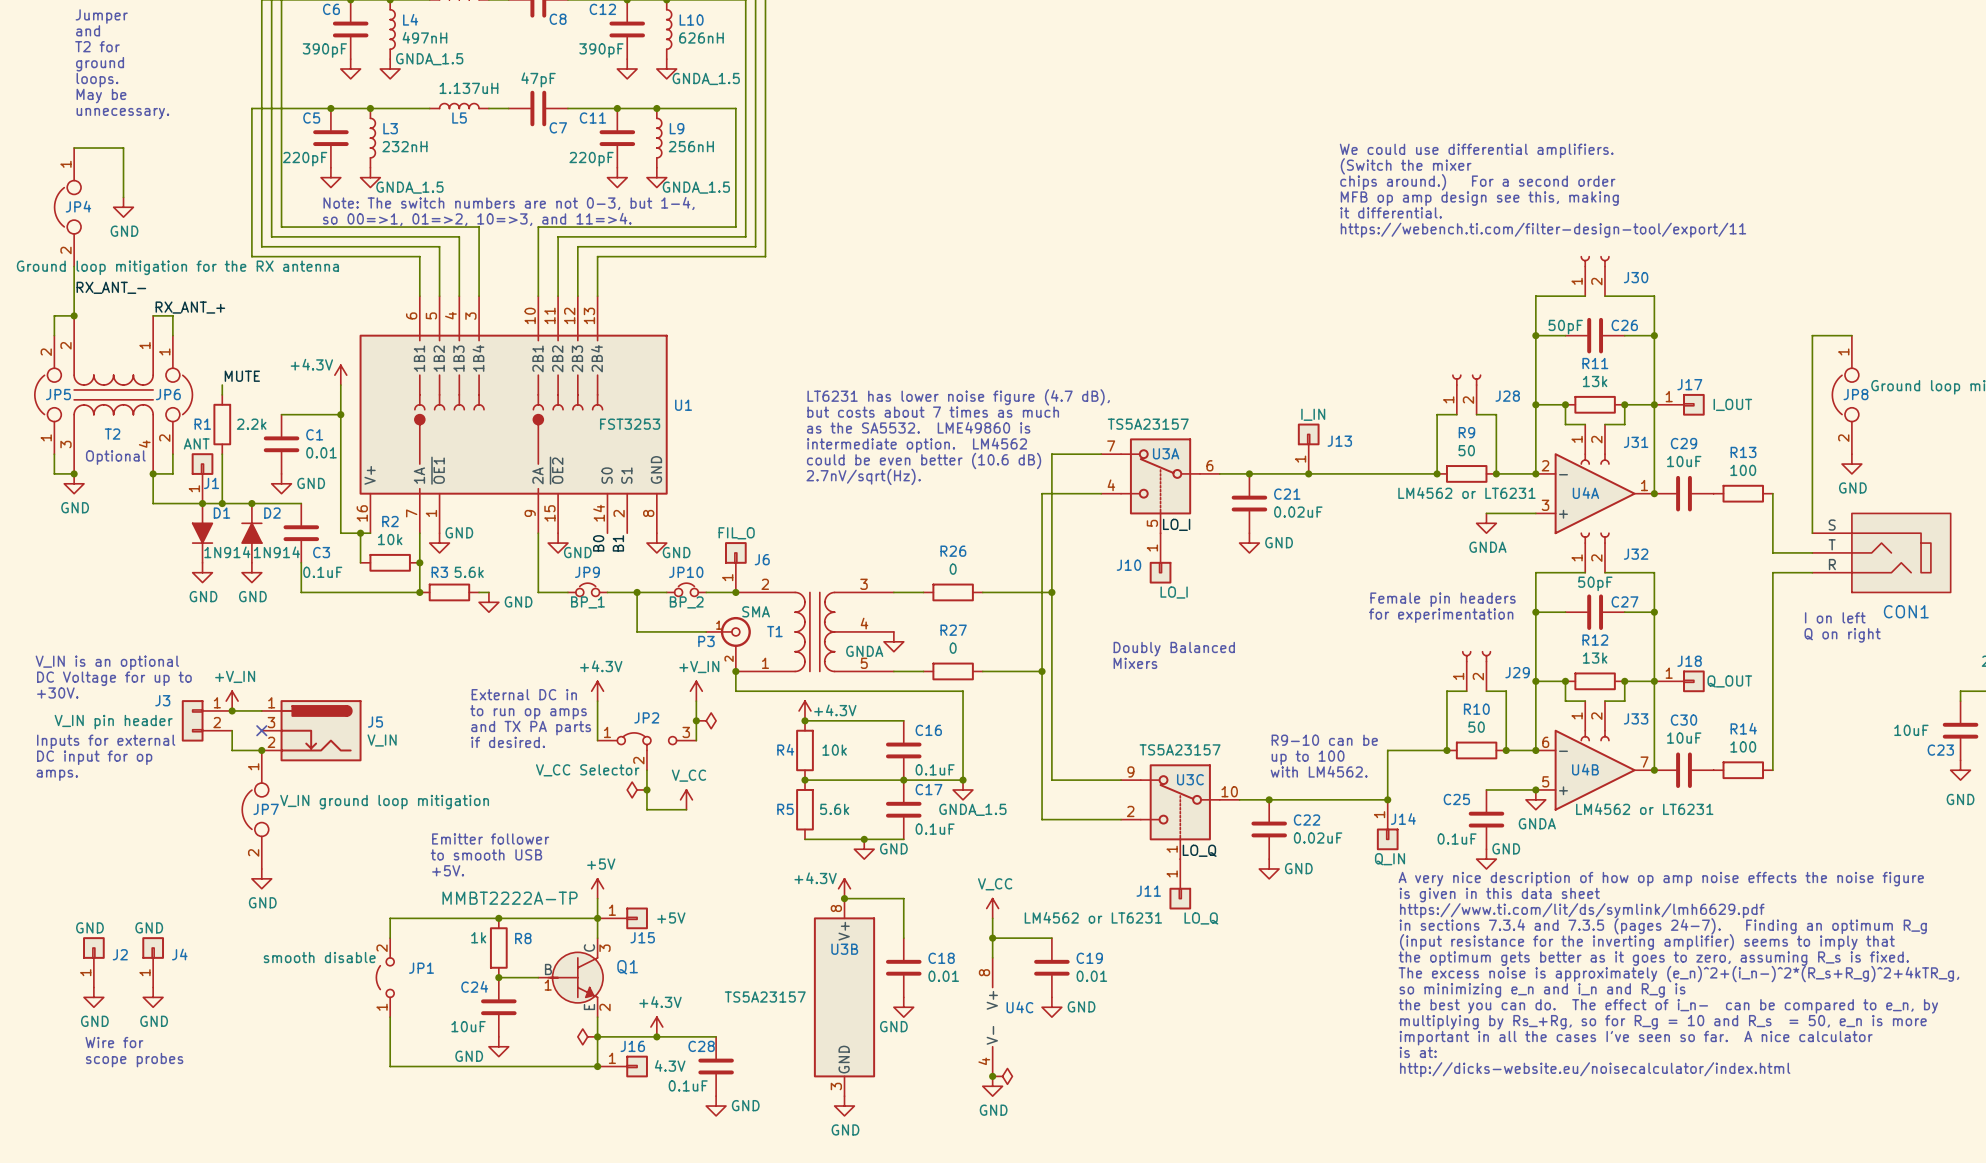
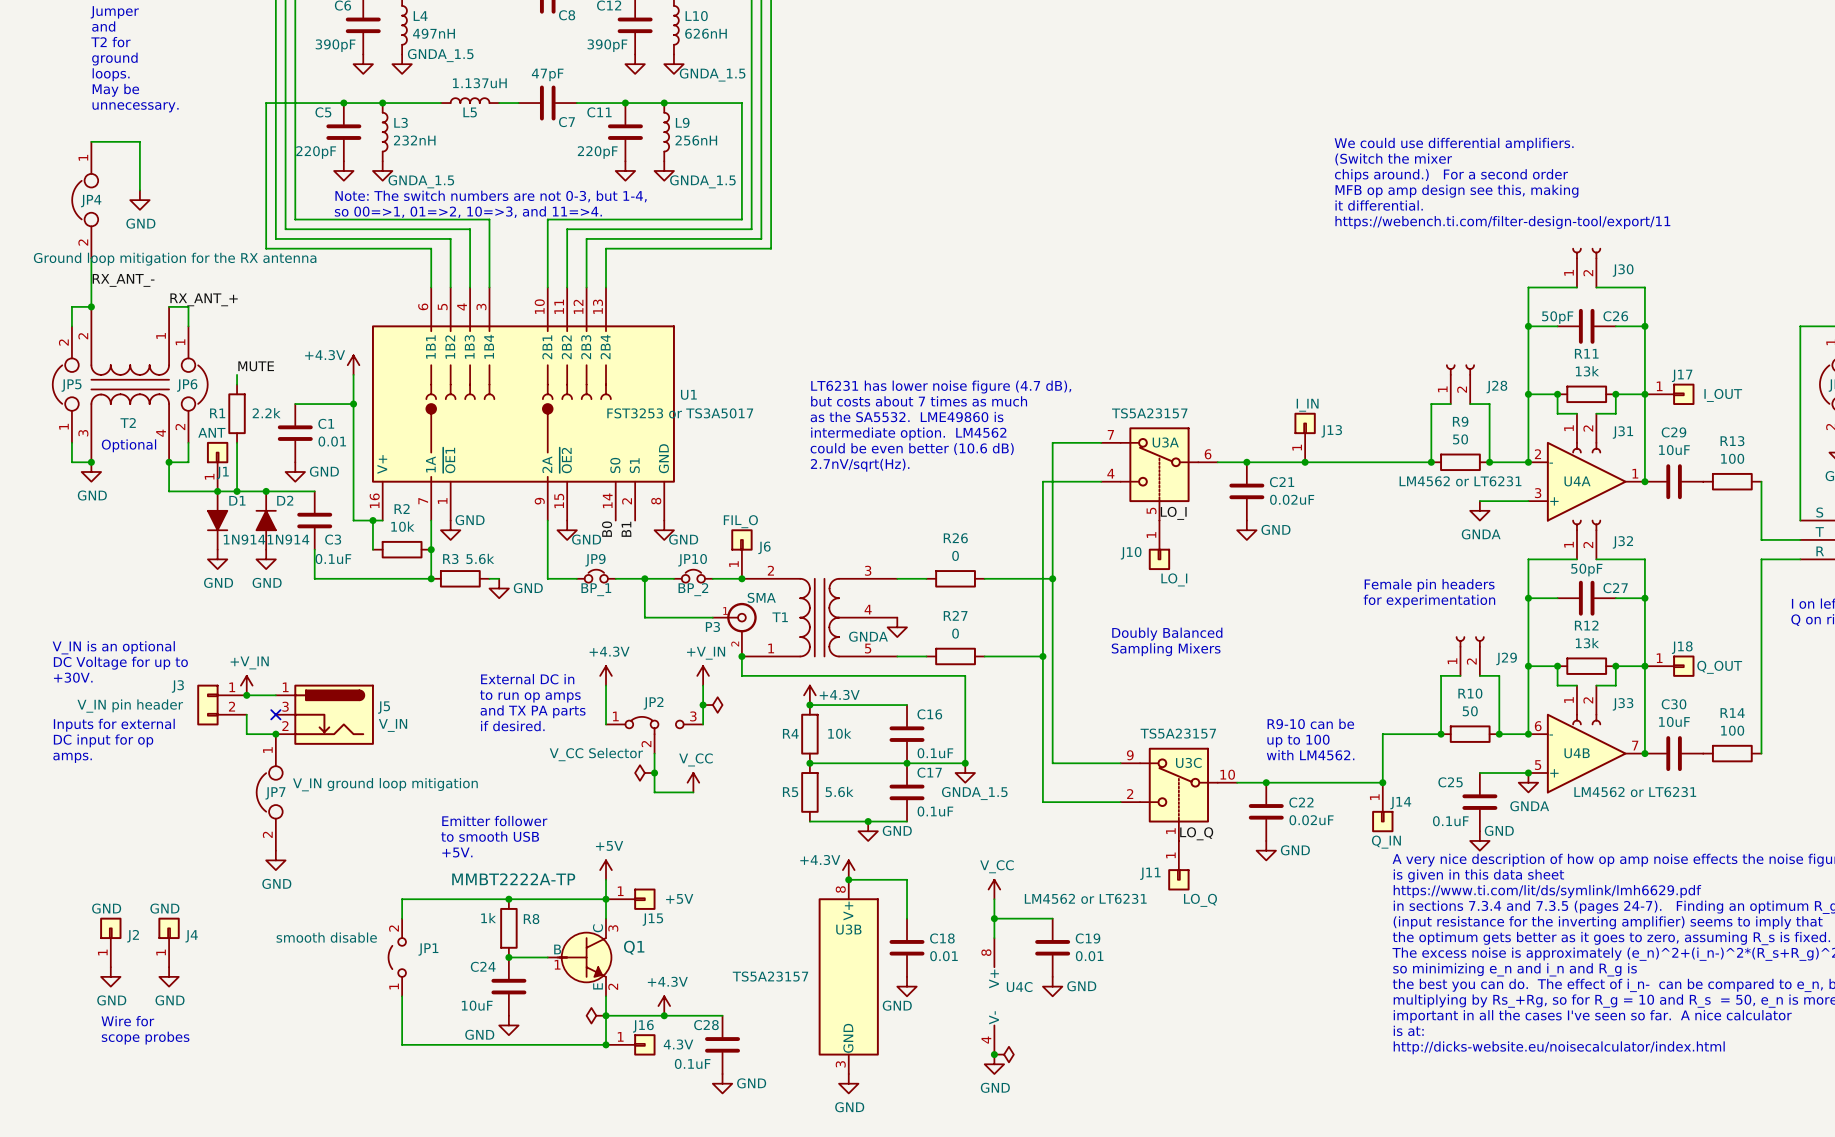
U1 value: FST3253 (630, 424) -> FST3253 or TS3A5017 (680, 413)
text: Mixers (1135, 663) -> Sampling Mixers (1166, 649)

